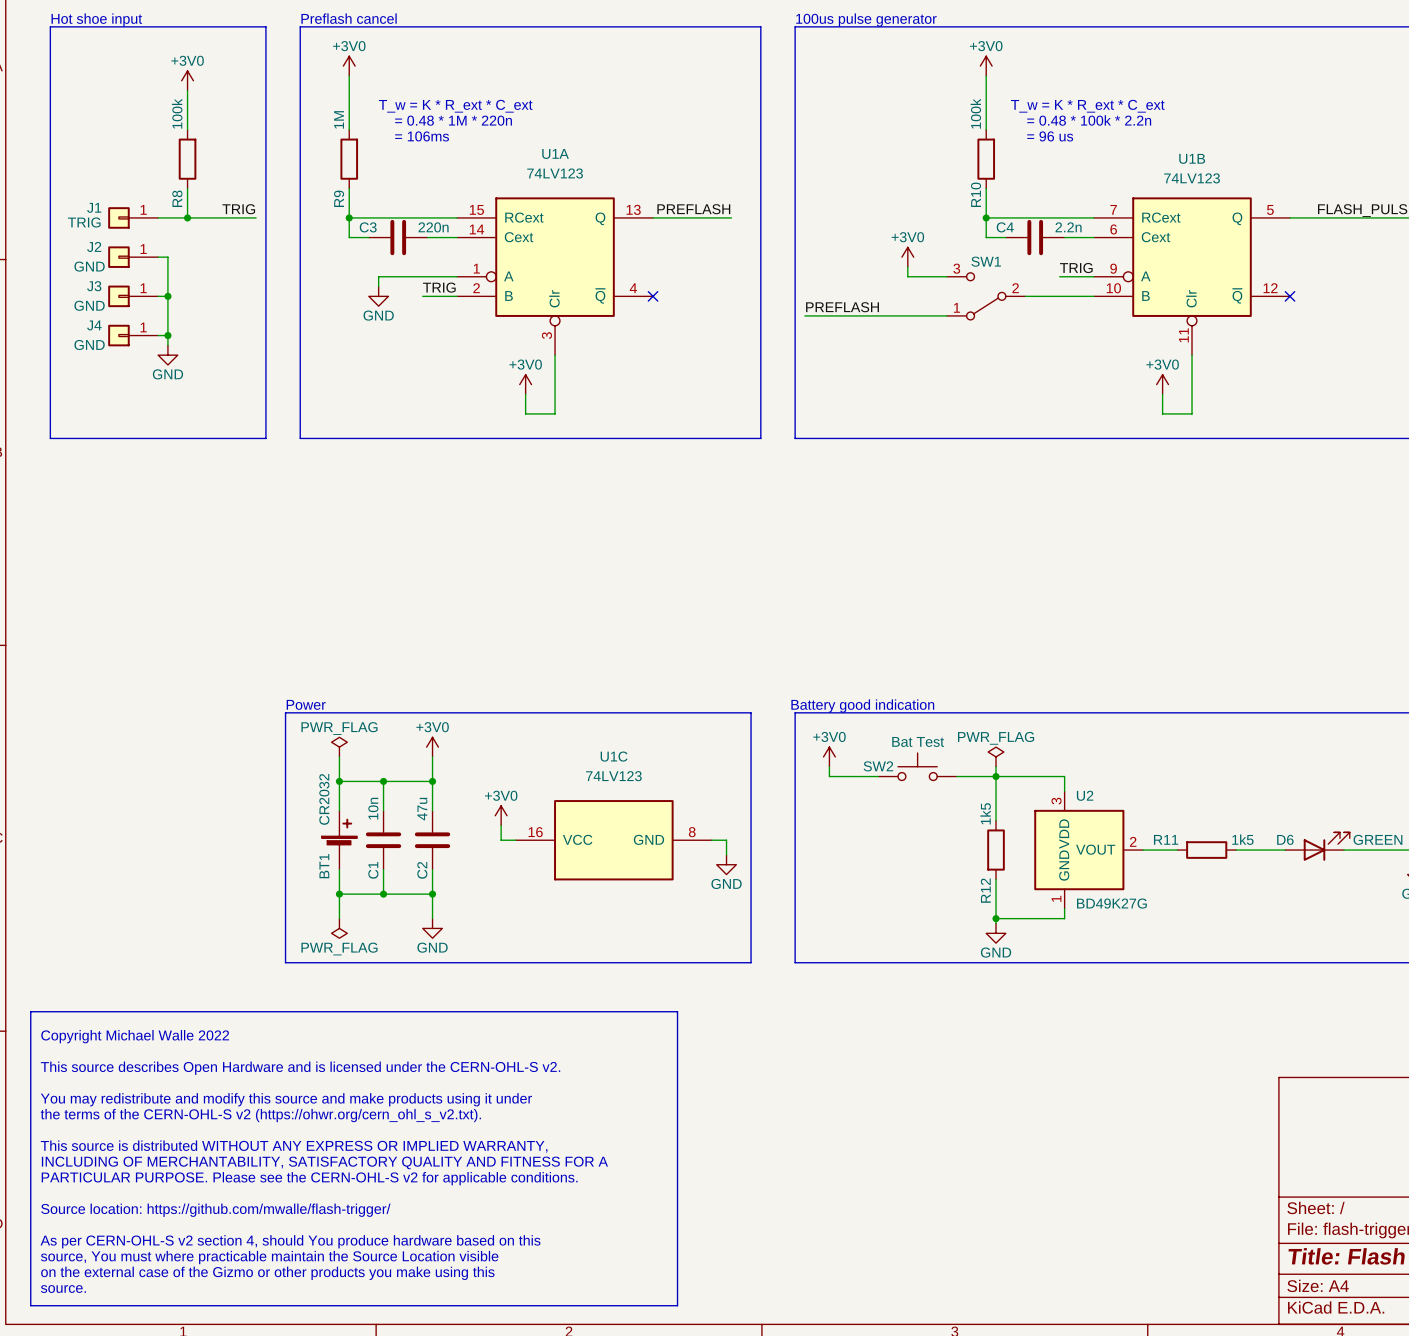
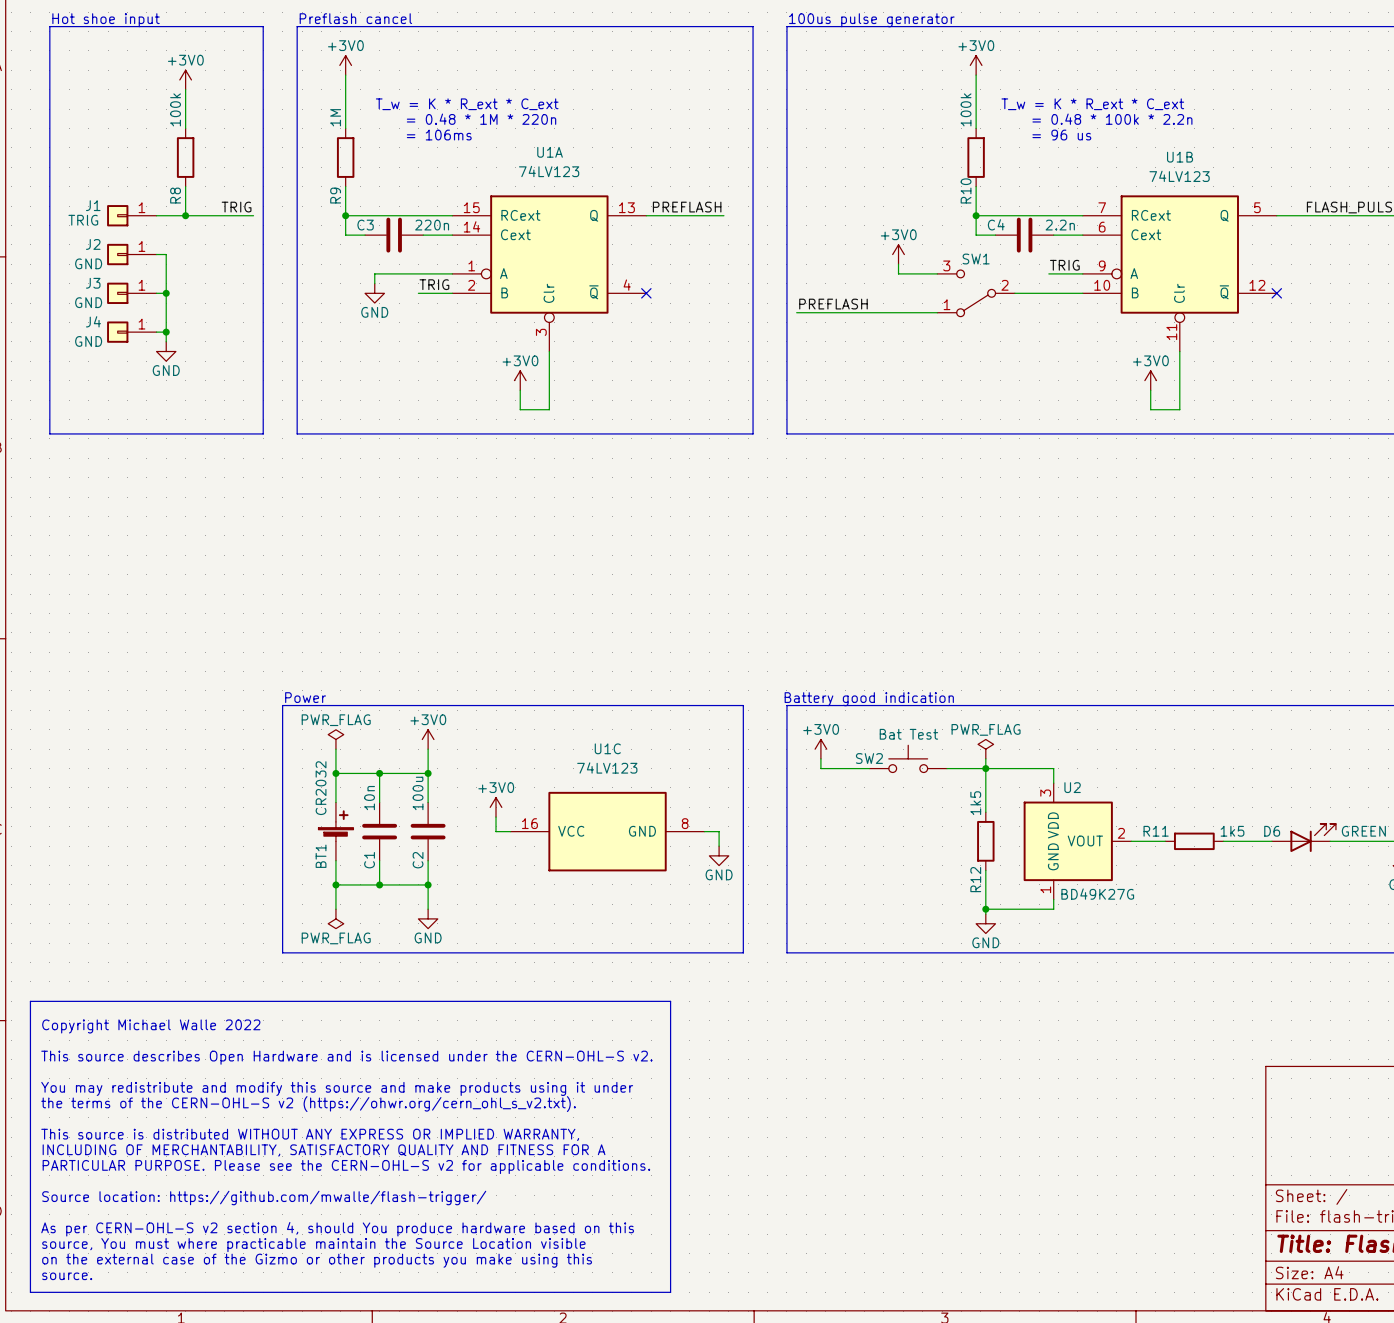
C2 value: 47u (422, 809) -> 100u (418, 793)

